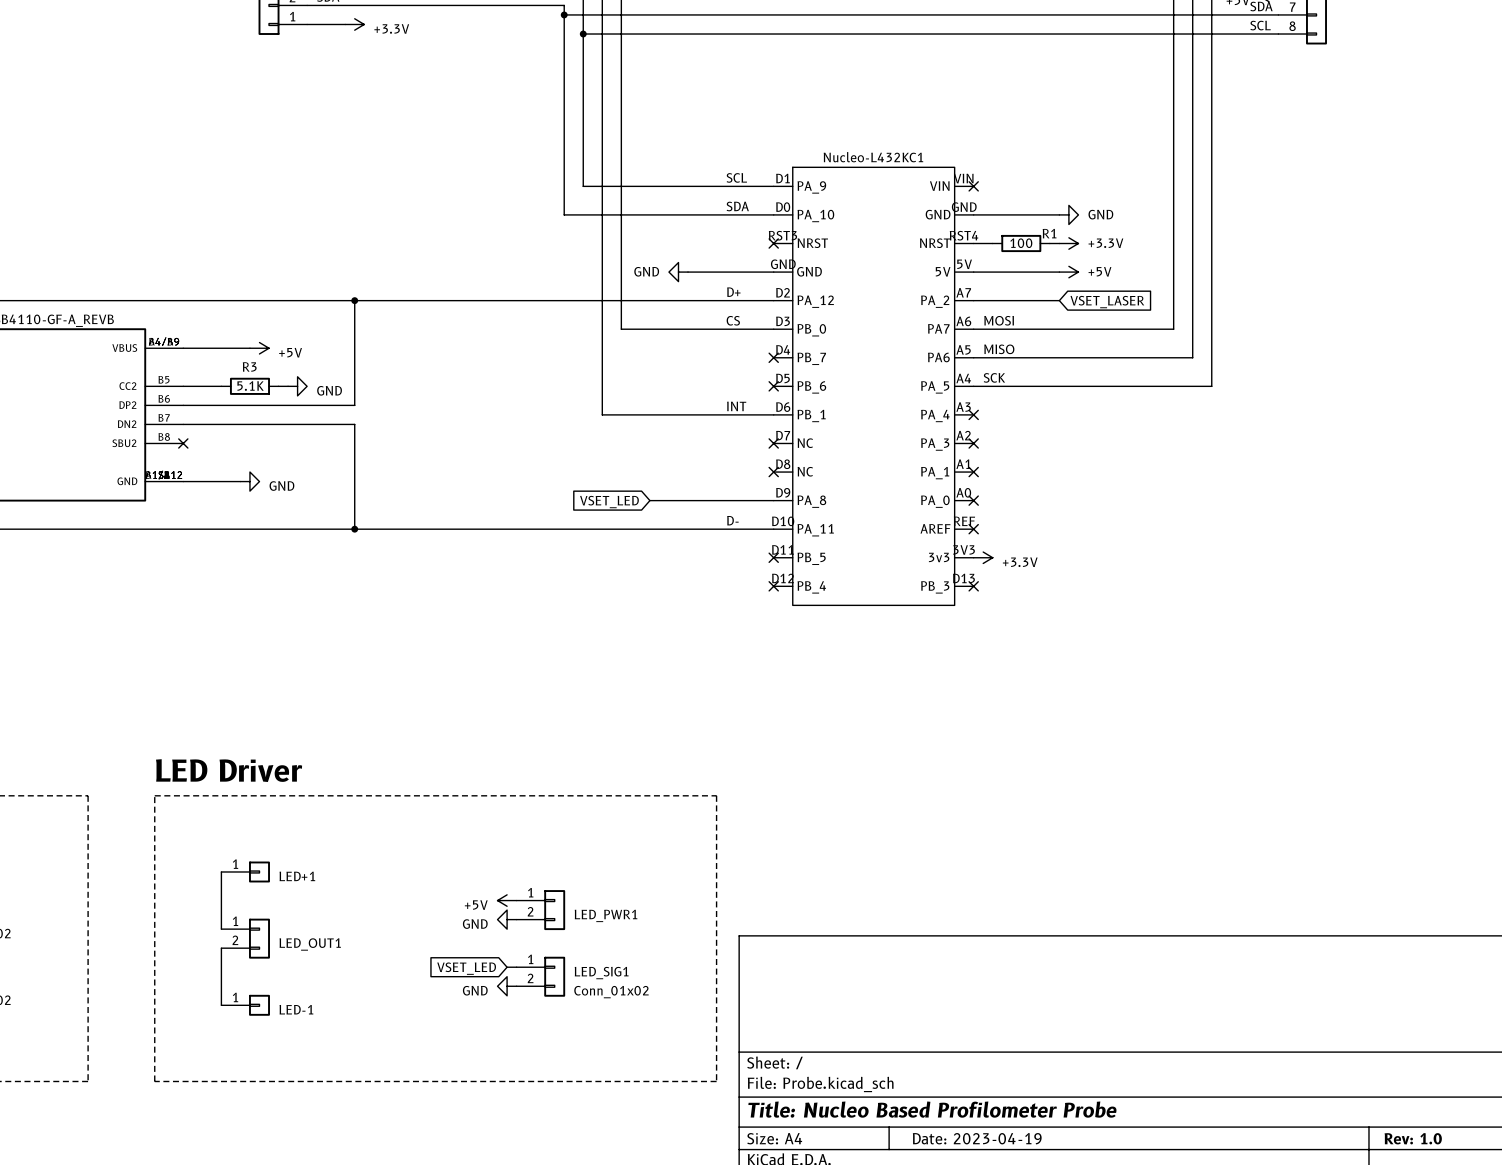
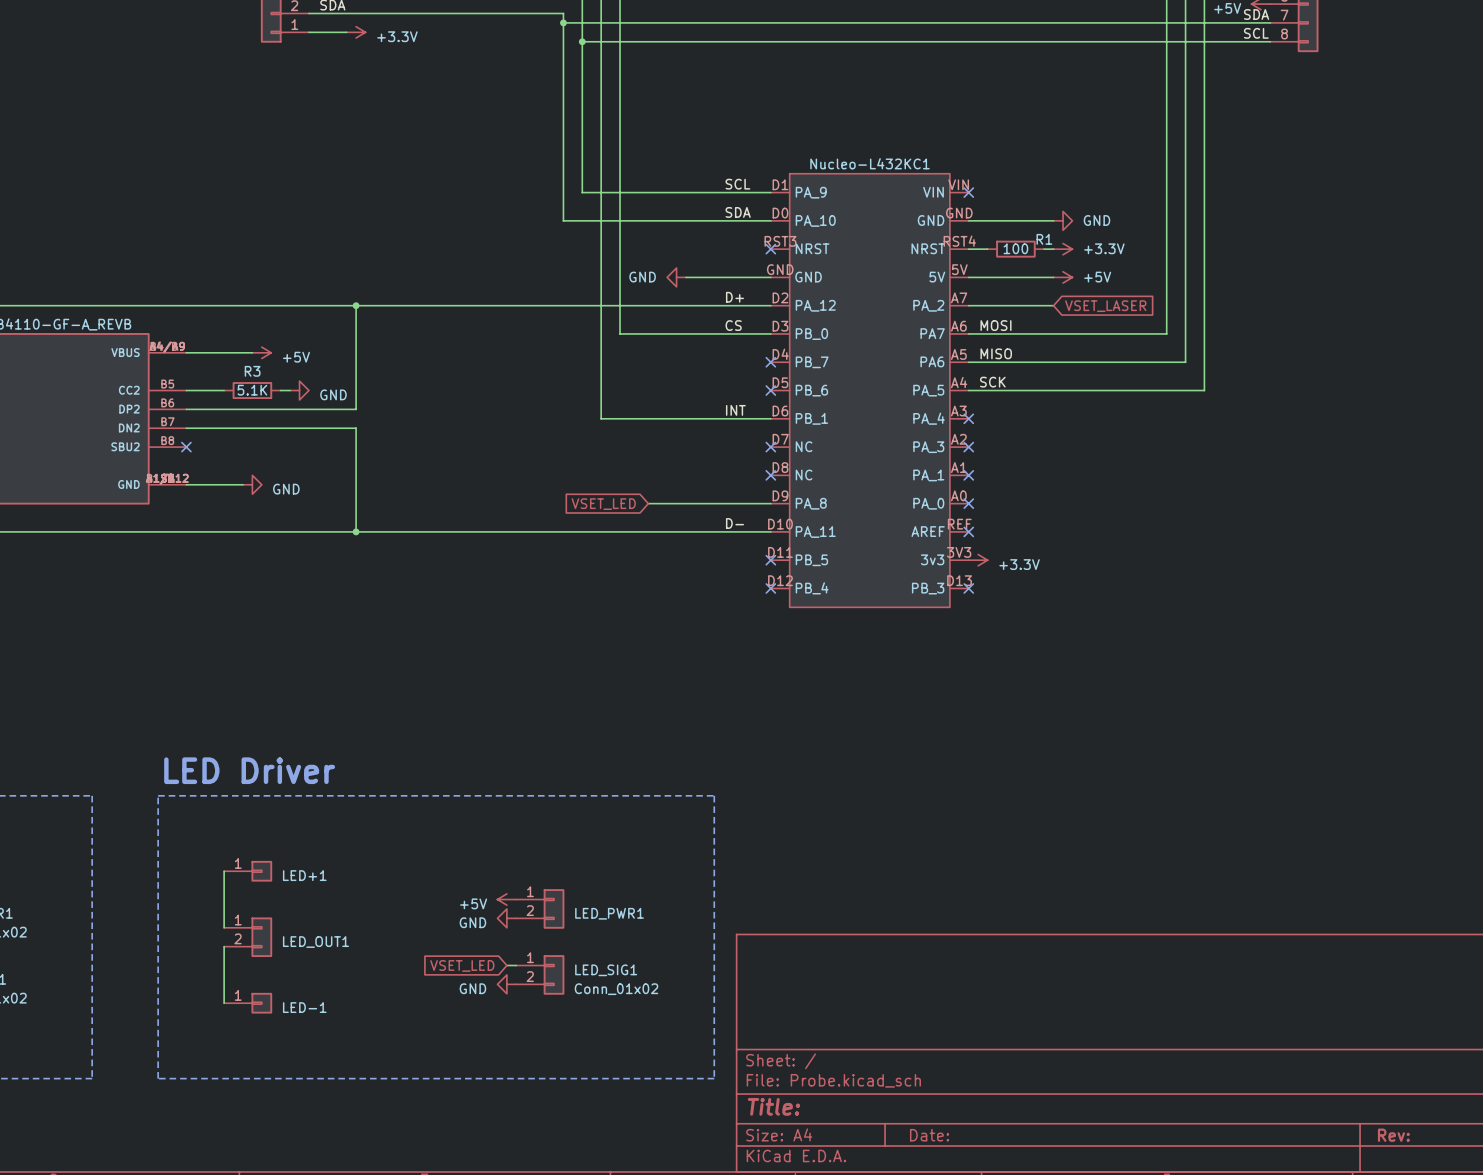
title block: Title: Nucleo Based Profilometer Probe (932, 1109) -> Title: (773, 1106)
title block: Date: 2023-04-19 (977, 1138) -> Date: (929, 1135)
title block: Rev: 1.0 (1413, 1138) -> Rev: (1393, 1135)

